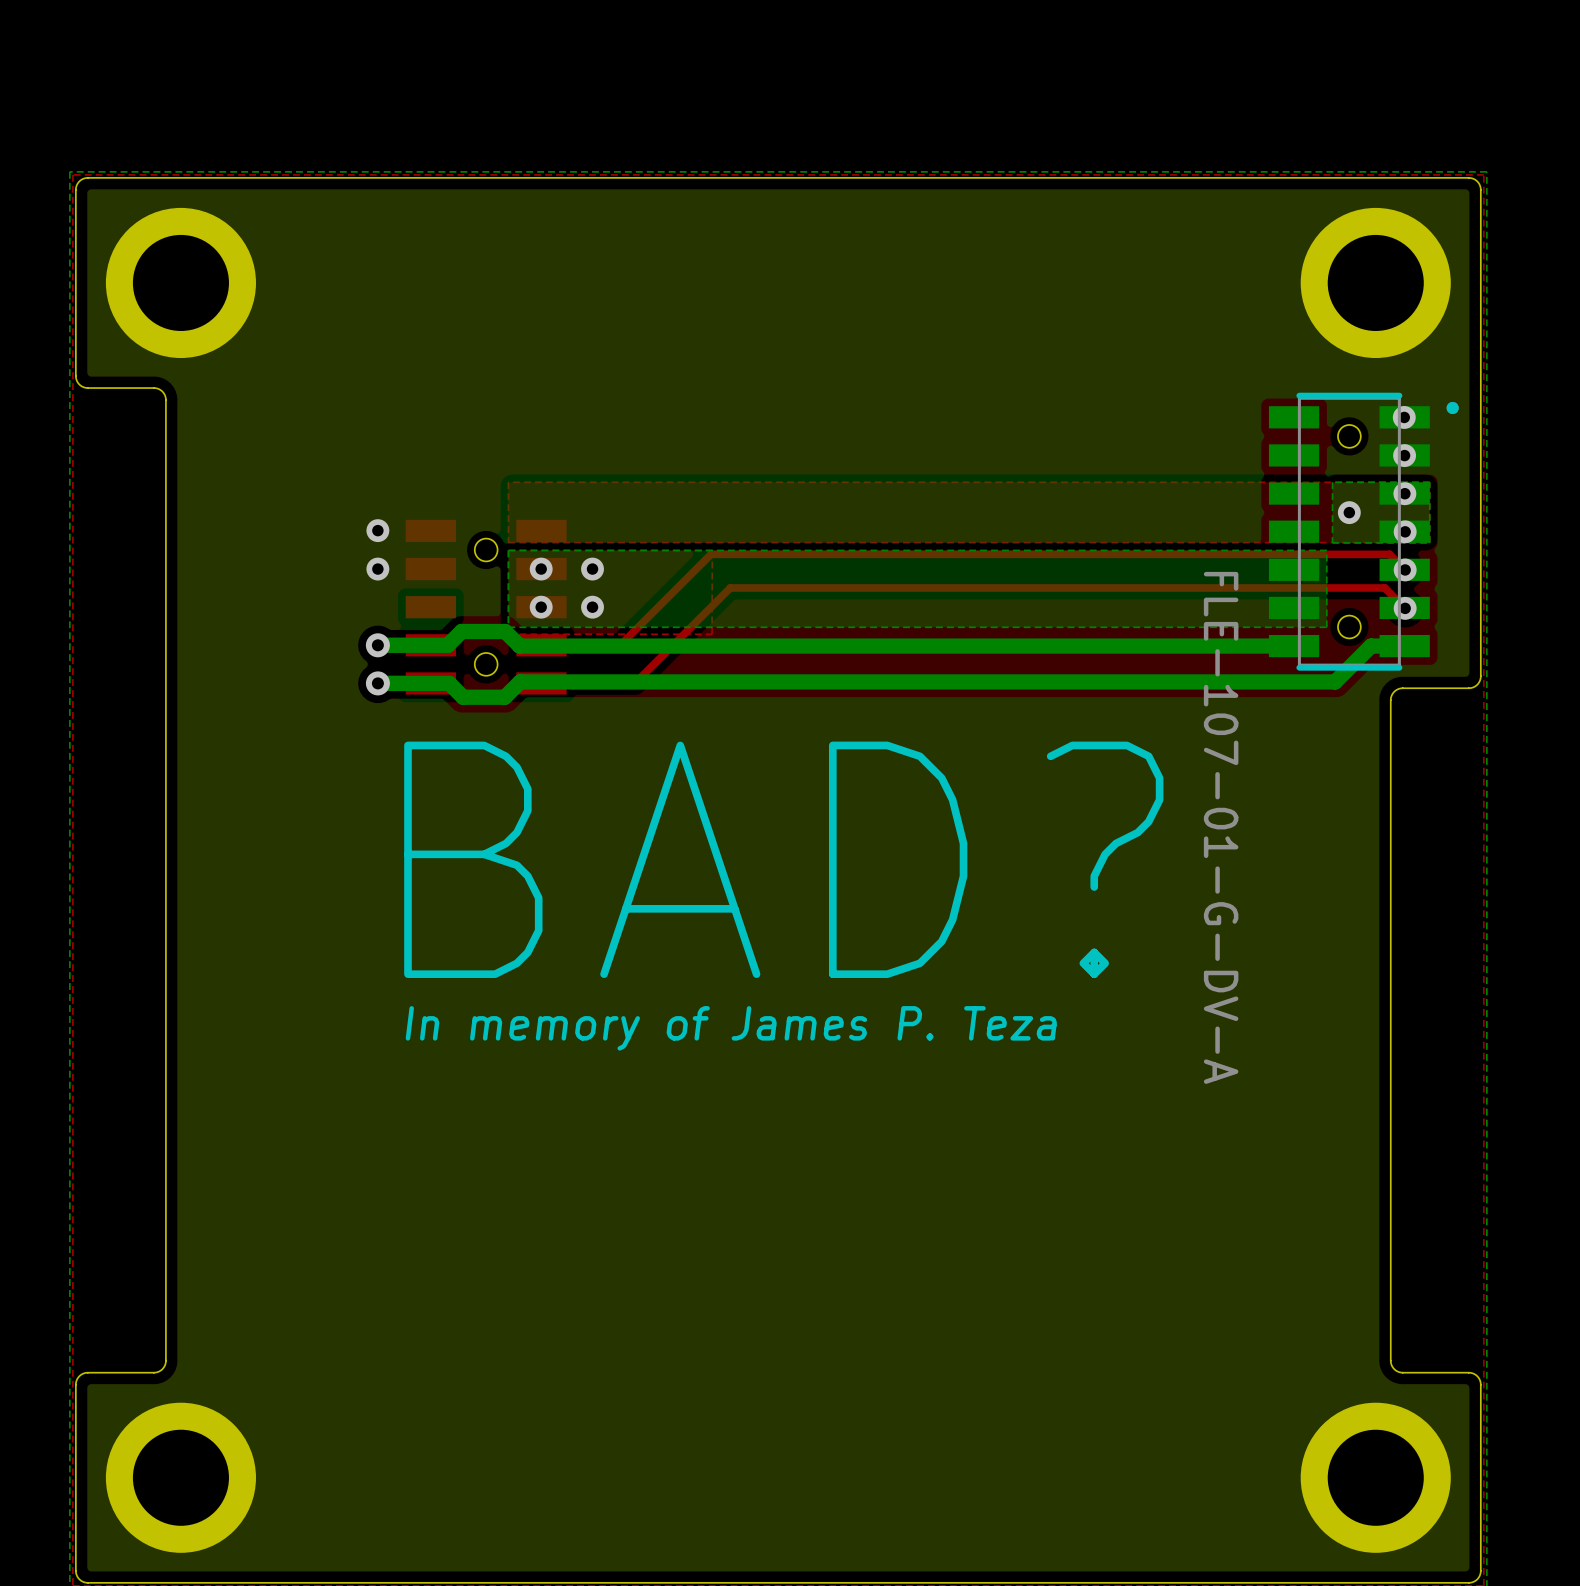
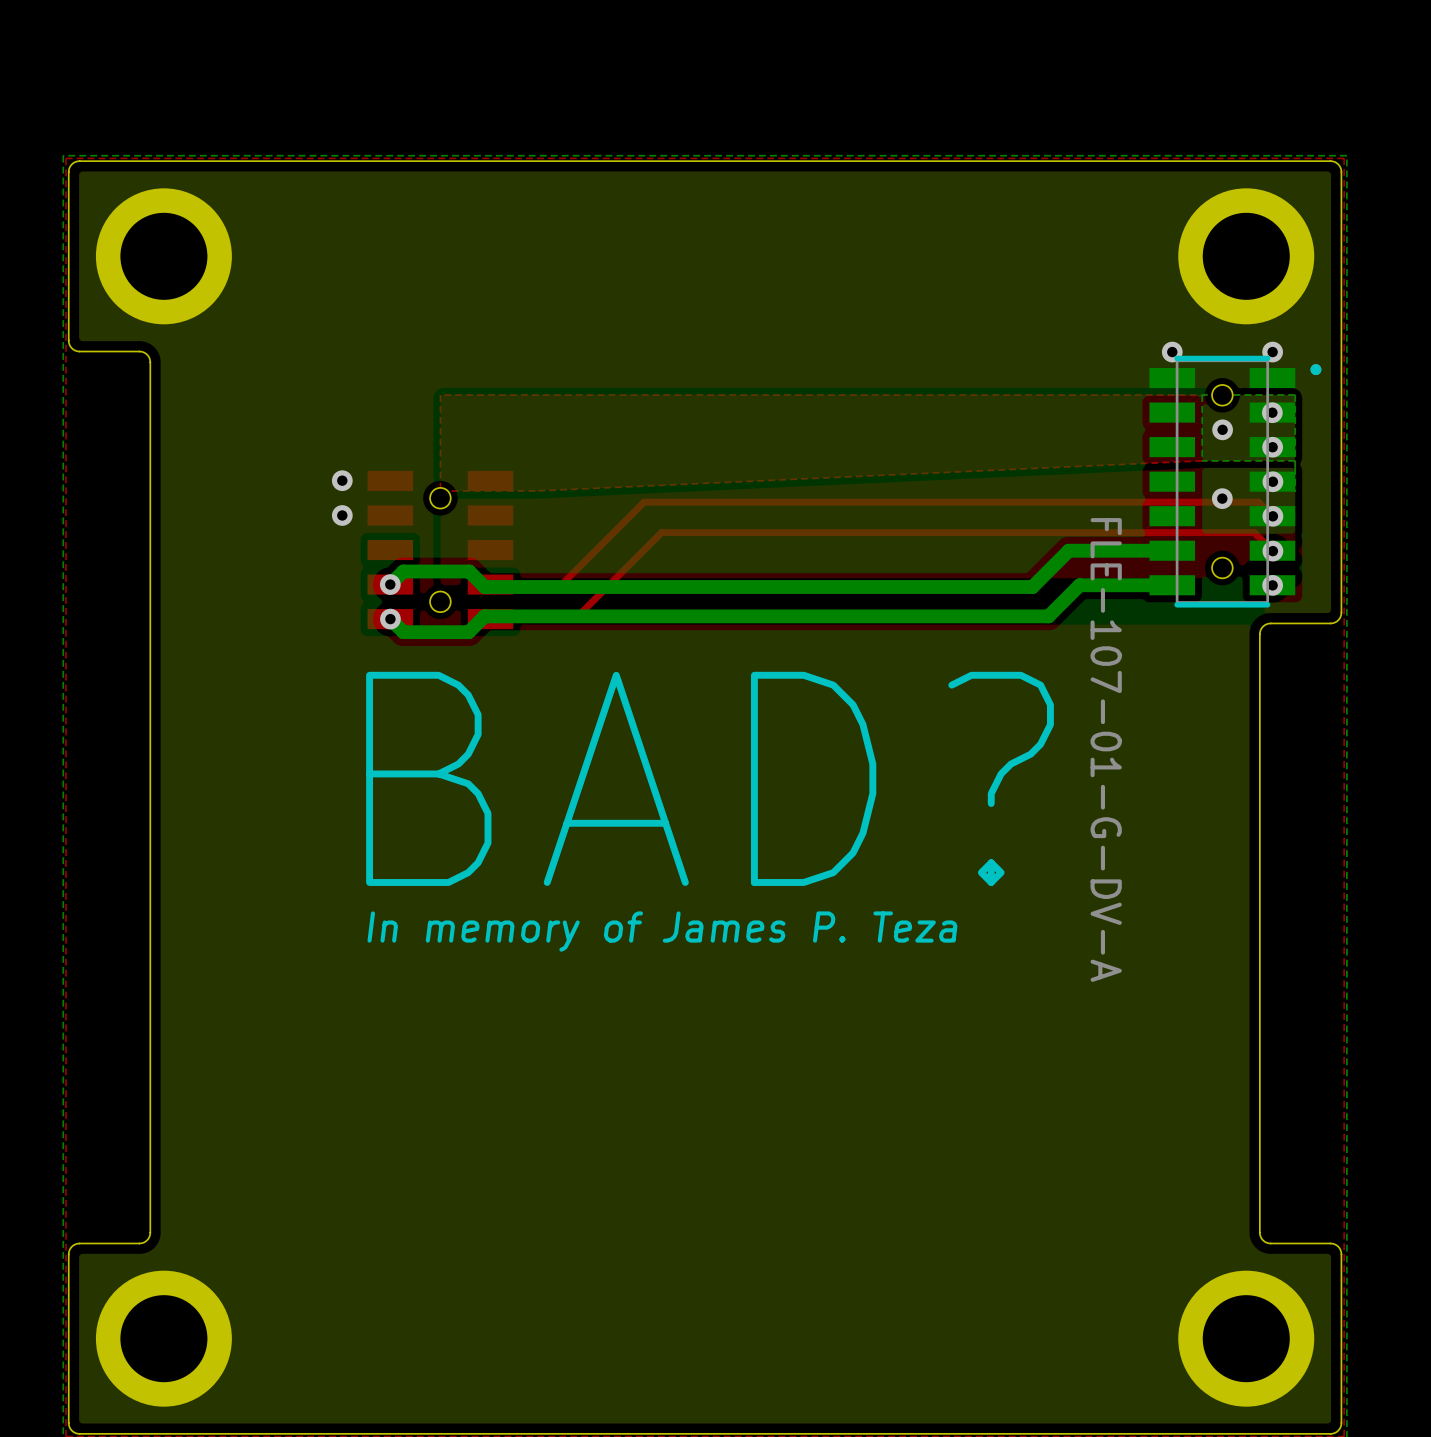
via: none -> (1172, 352)
via position: (1404, 417) -> (1272, 352)
via: none -> (1222, 429)
top zone outline: (1429, 482) (508, 482) (508, 542) (1429, 542) -> (1295, 436) (1295, 395) (440, 395) (440, 491) (535, 491) (1202, 460) (1295, 460)
bottom zone outline: (1429, 482) (1332, 482) (1332, 542) (1429, 542) -> (1295, 436) (1295, 395) (1202, 395) (1202, 460) (1295, 460)
via: (1349, 512) -> none
top zone outline: (712, 550) (712, 634) (508, 634) (508, 550) (712, 550) -> none
bottom zone outline: (1326, 550) (1326, 627) (508, 627) (508, 550) (1326, 550) -> none
via: none -> (1222, 498)
via: (541, 569) -> none
via: (592, 569) -> none
via: (541, 607) -> none
via: (592, 607) -> none
bottom track: none -> (1172, 550) (1068, 550) (1032, 587) (484, 587) (469, 571) (403, 571) (390, 584)
bottom track: (377, 645) (447, 645) (461, 631) (505, 631) (519, 646) (1191, 646) -> (390, 619) (403, 632) (468, 632) (484, 616) (1048, 616) (1079, 585)
via: (377, 645) -> none
via: none -> (390, 584)
bottom track: (1404, 646) (1371, 646) (1335, 681) (520, 681) (504, 697) (463, 697) (449, 683) (377, 683) -> none
via: none -> (1272, 585)
via: (377, 683) -> none
via: none -> (390, 619)

